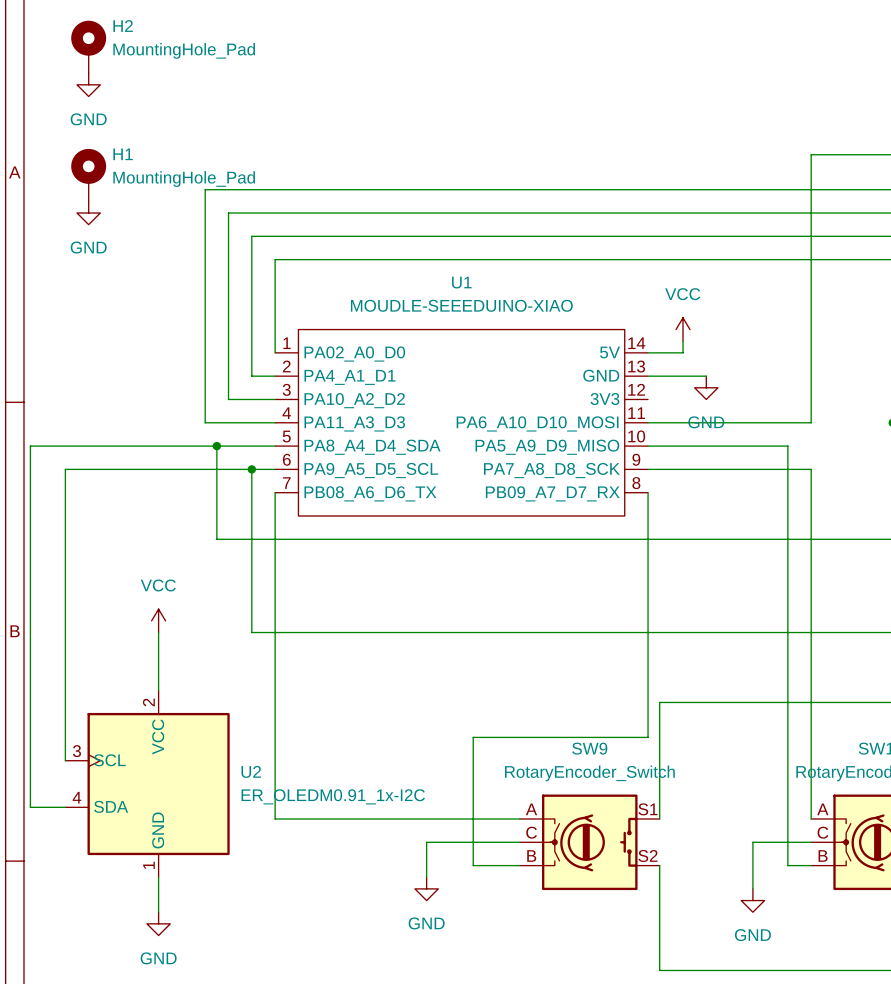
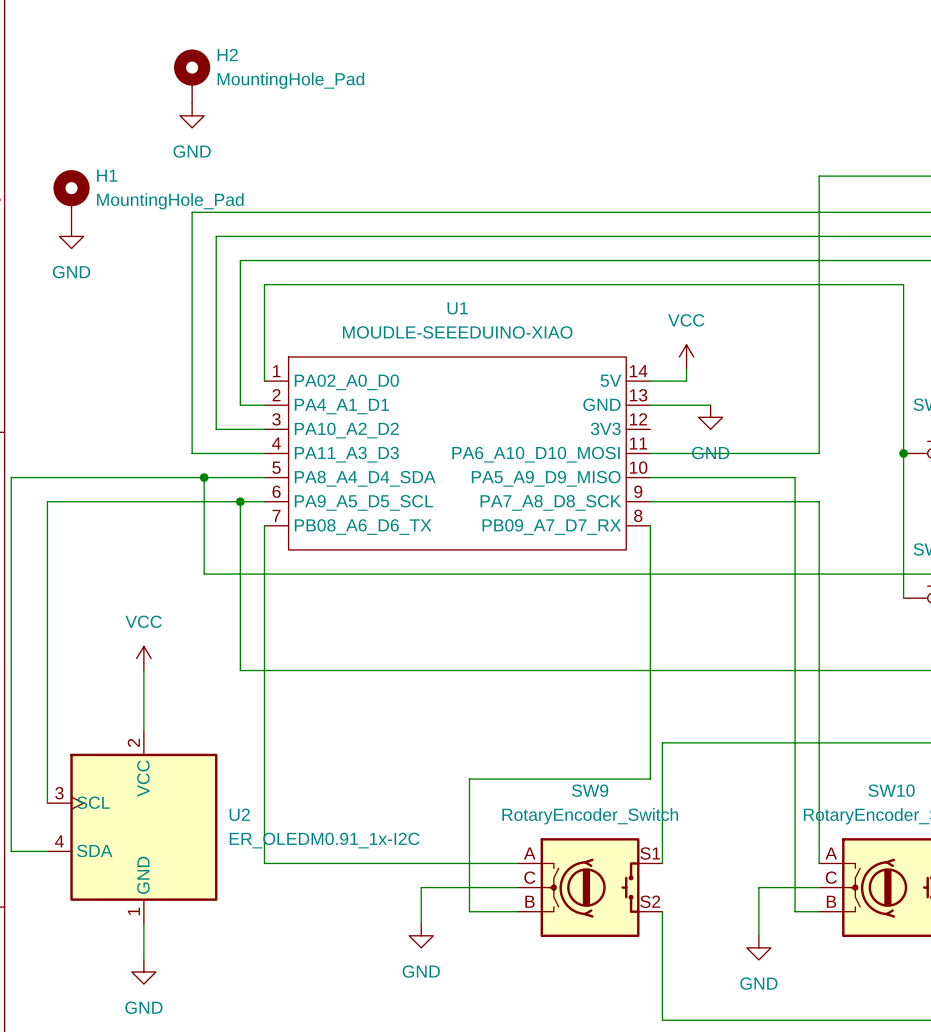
H2 position: (88, 46) -> (192, 76)
power symbol position: GND (88, 84) -> GND (192, 115)

